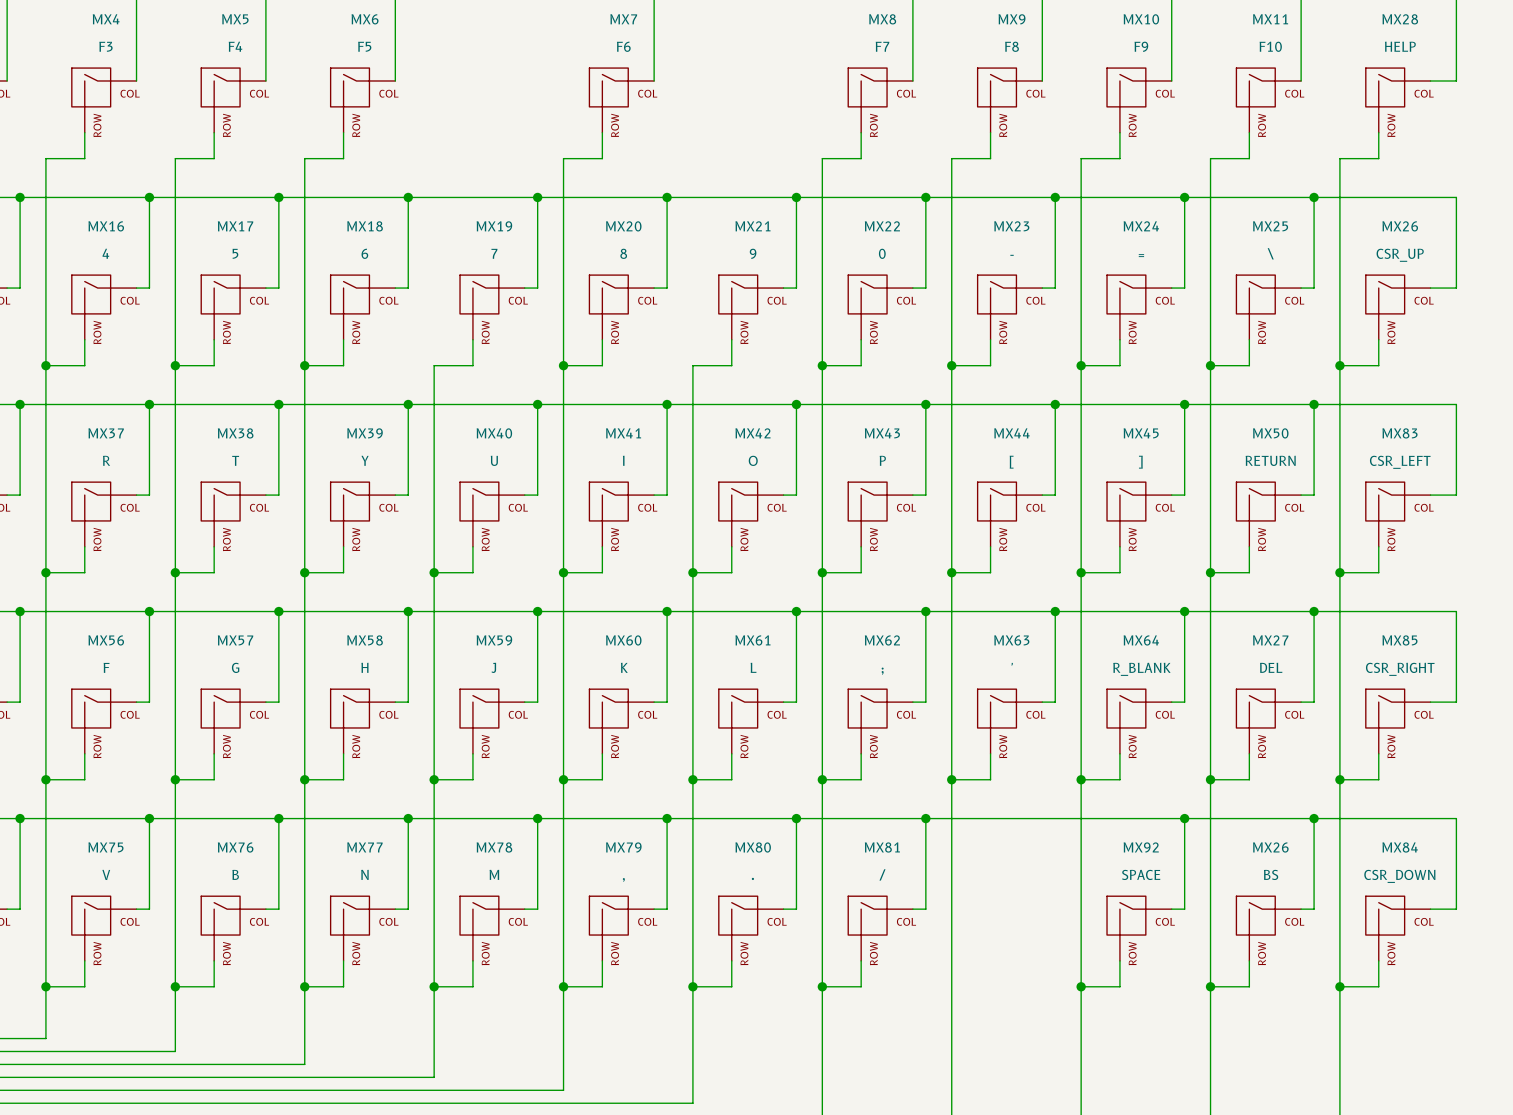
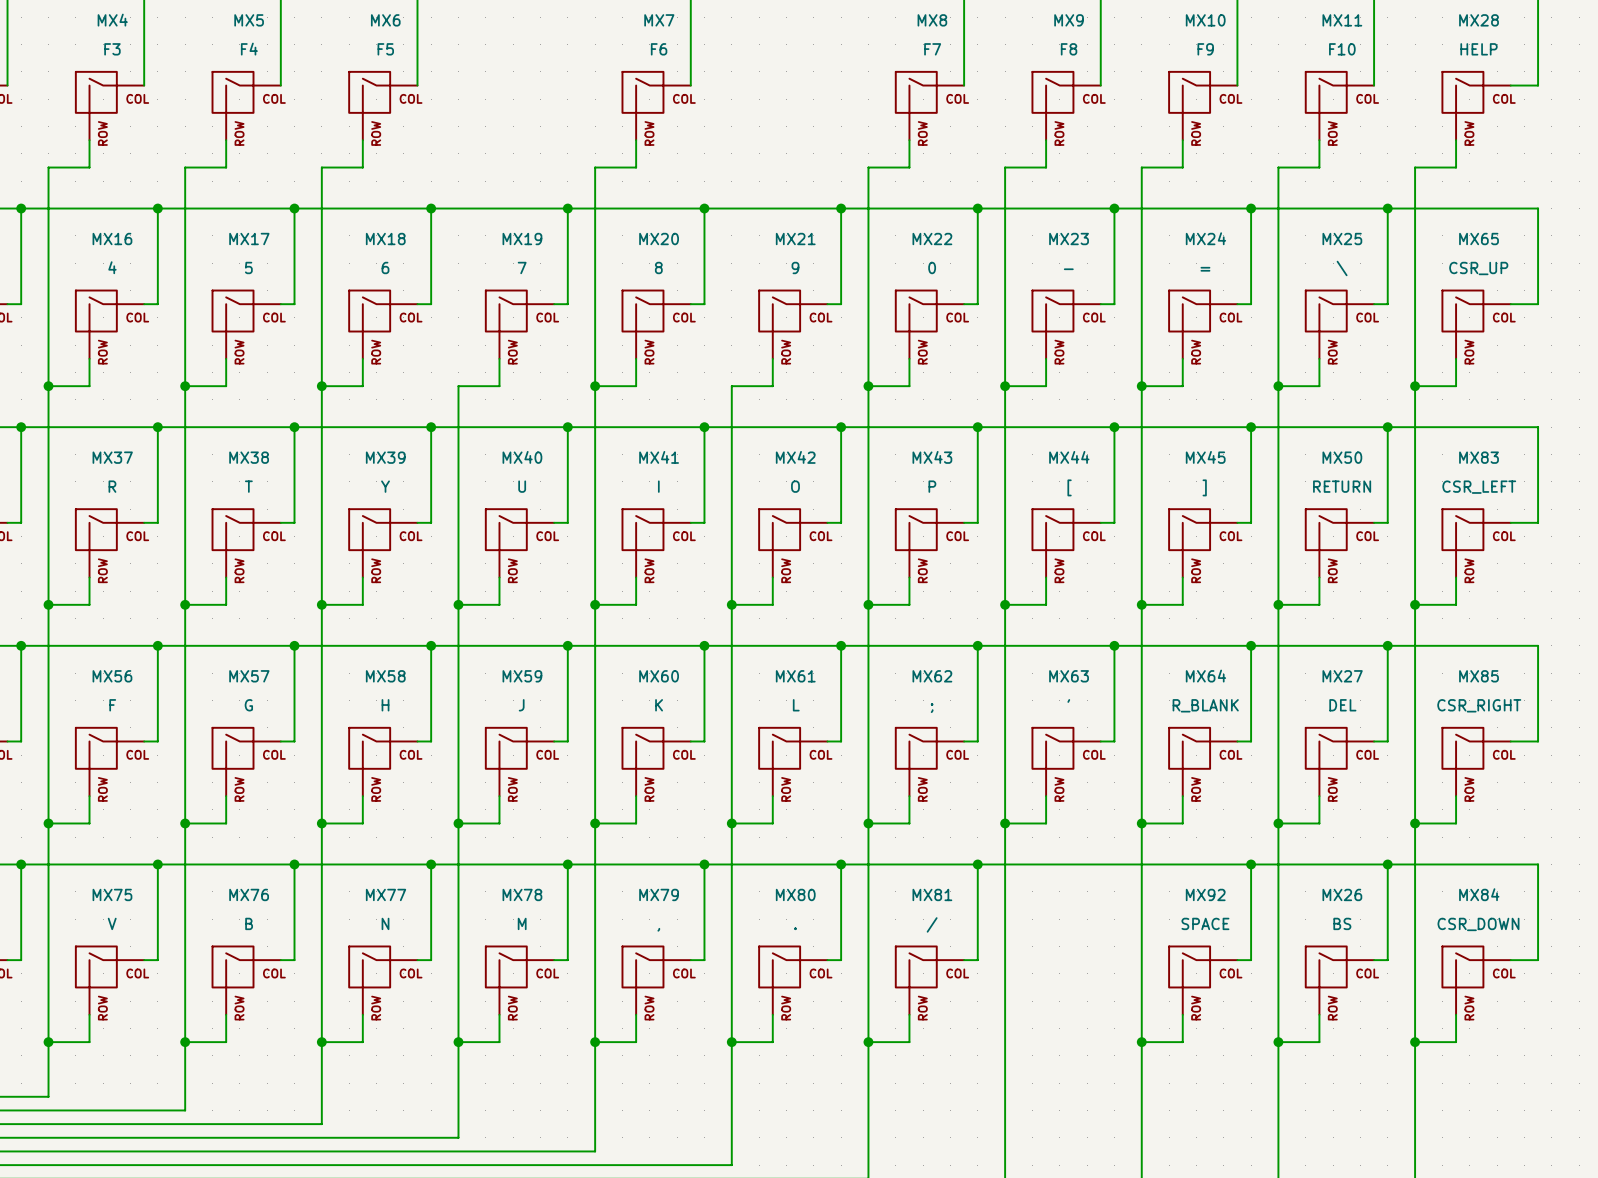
MX26 name: MX26 (1400, 226) -> MX65 (1479, 239)

